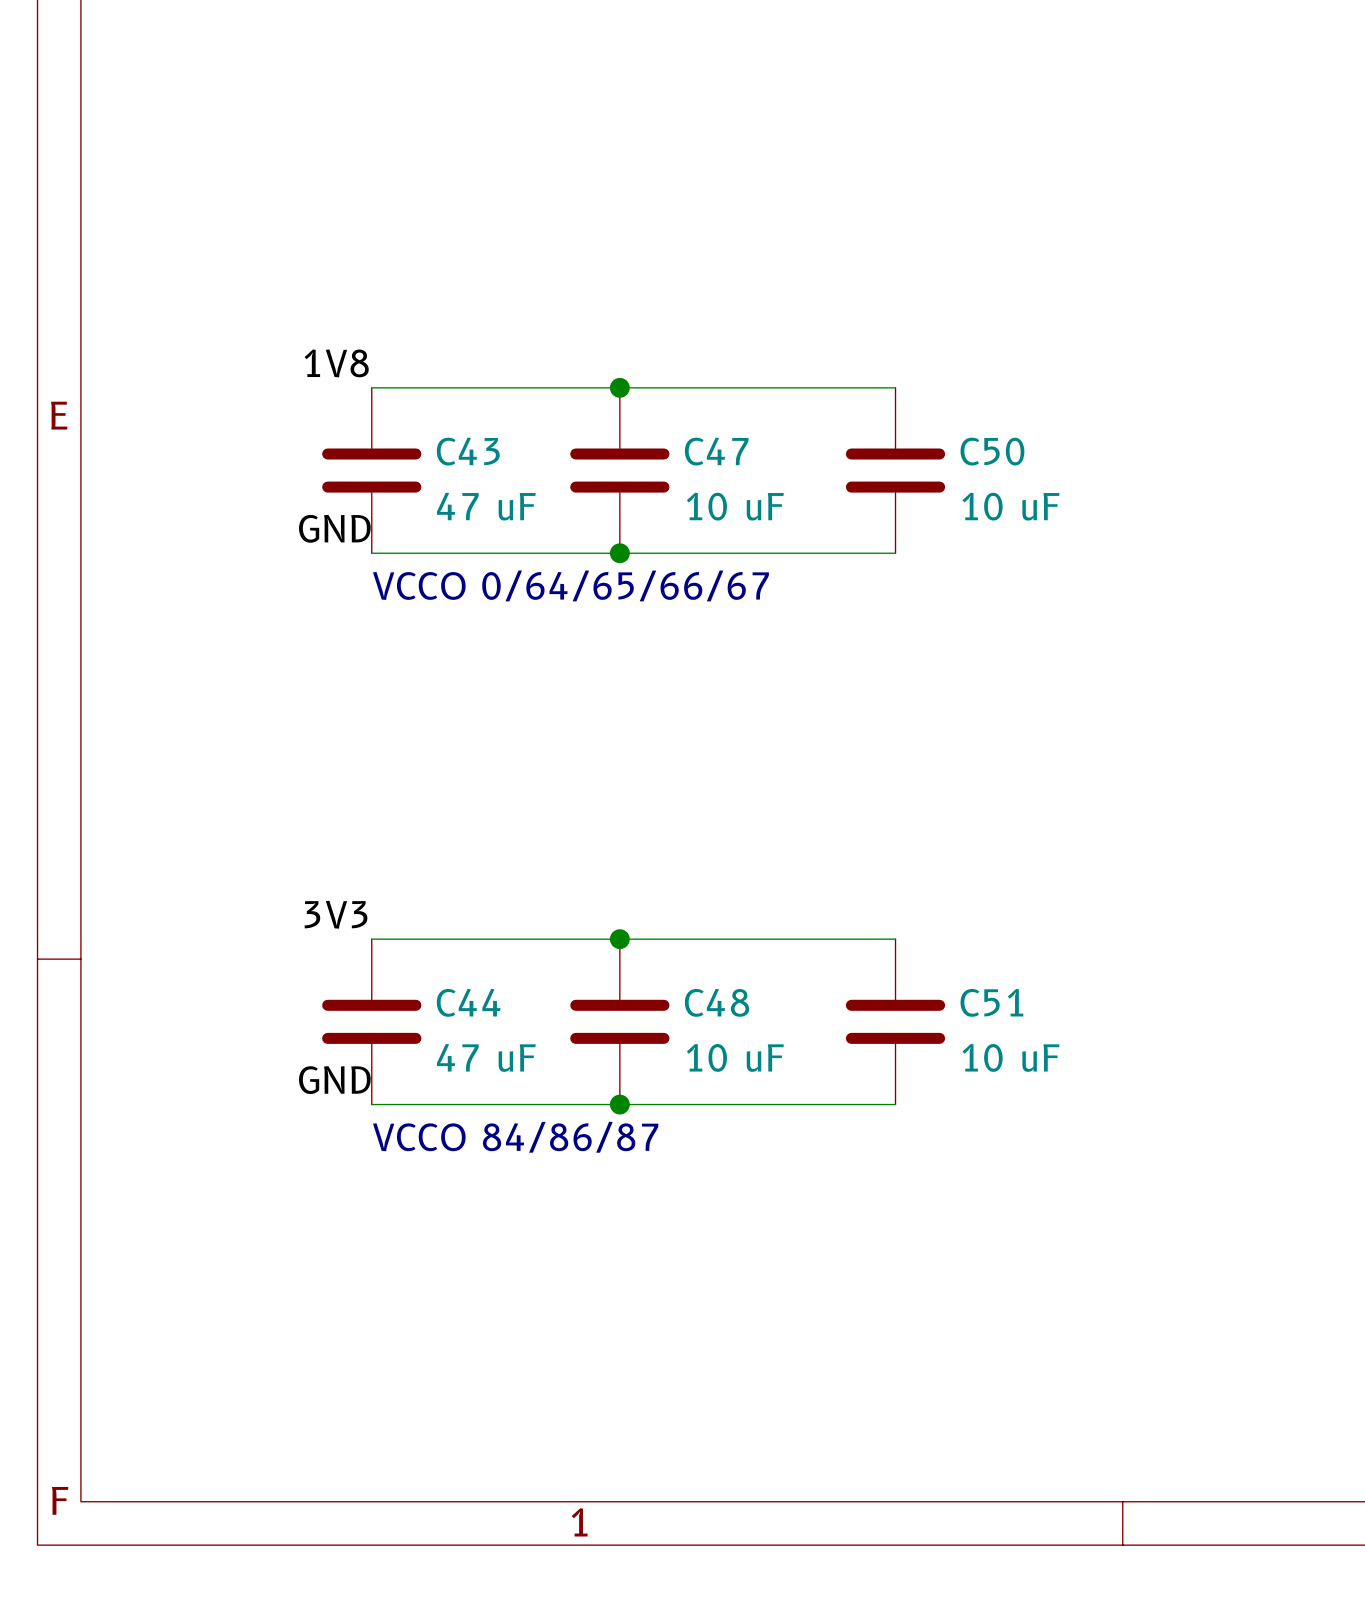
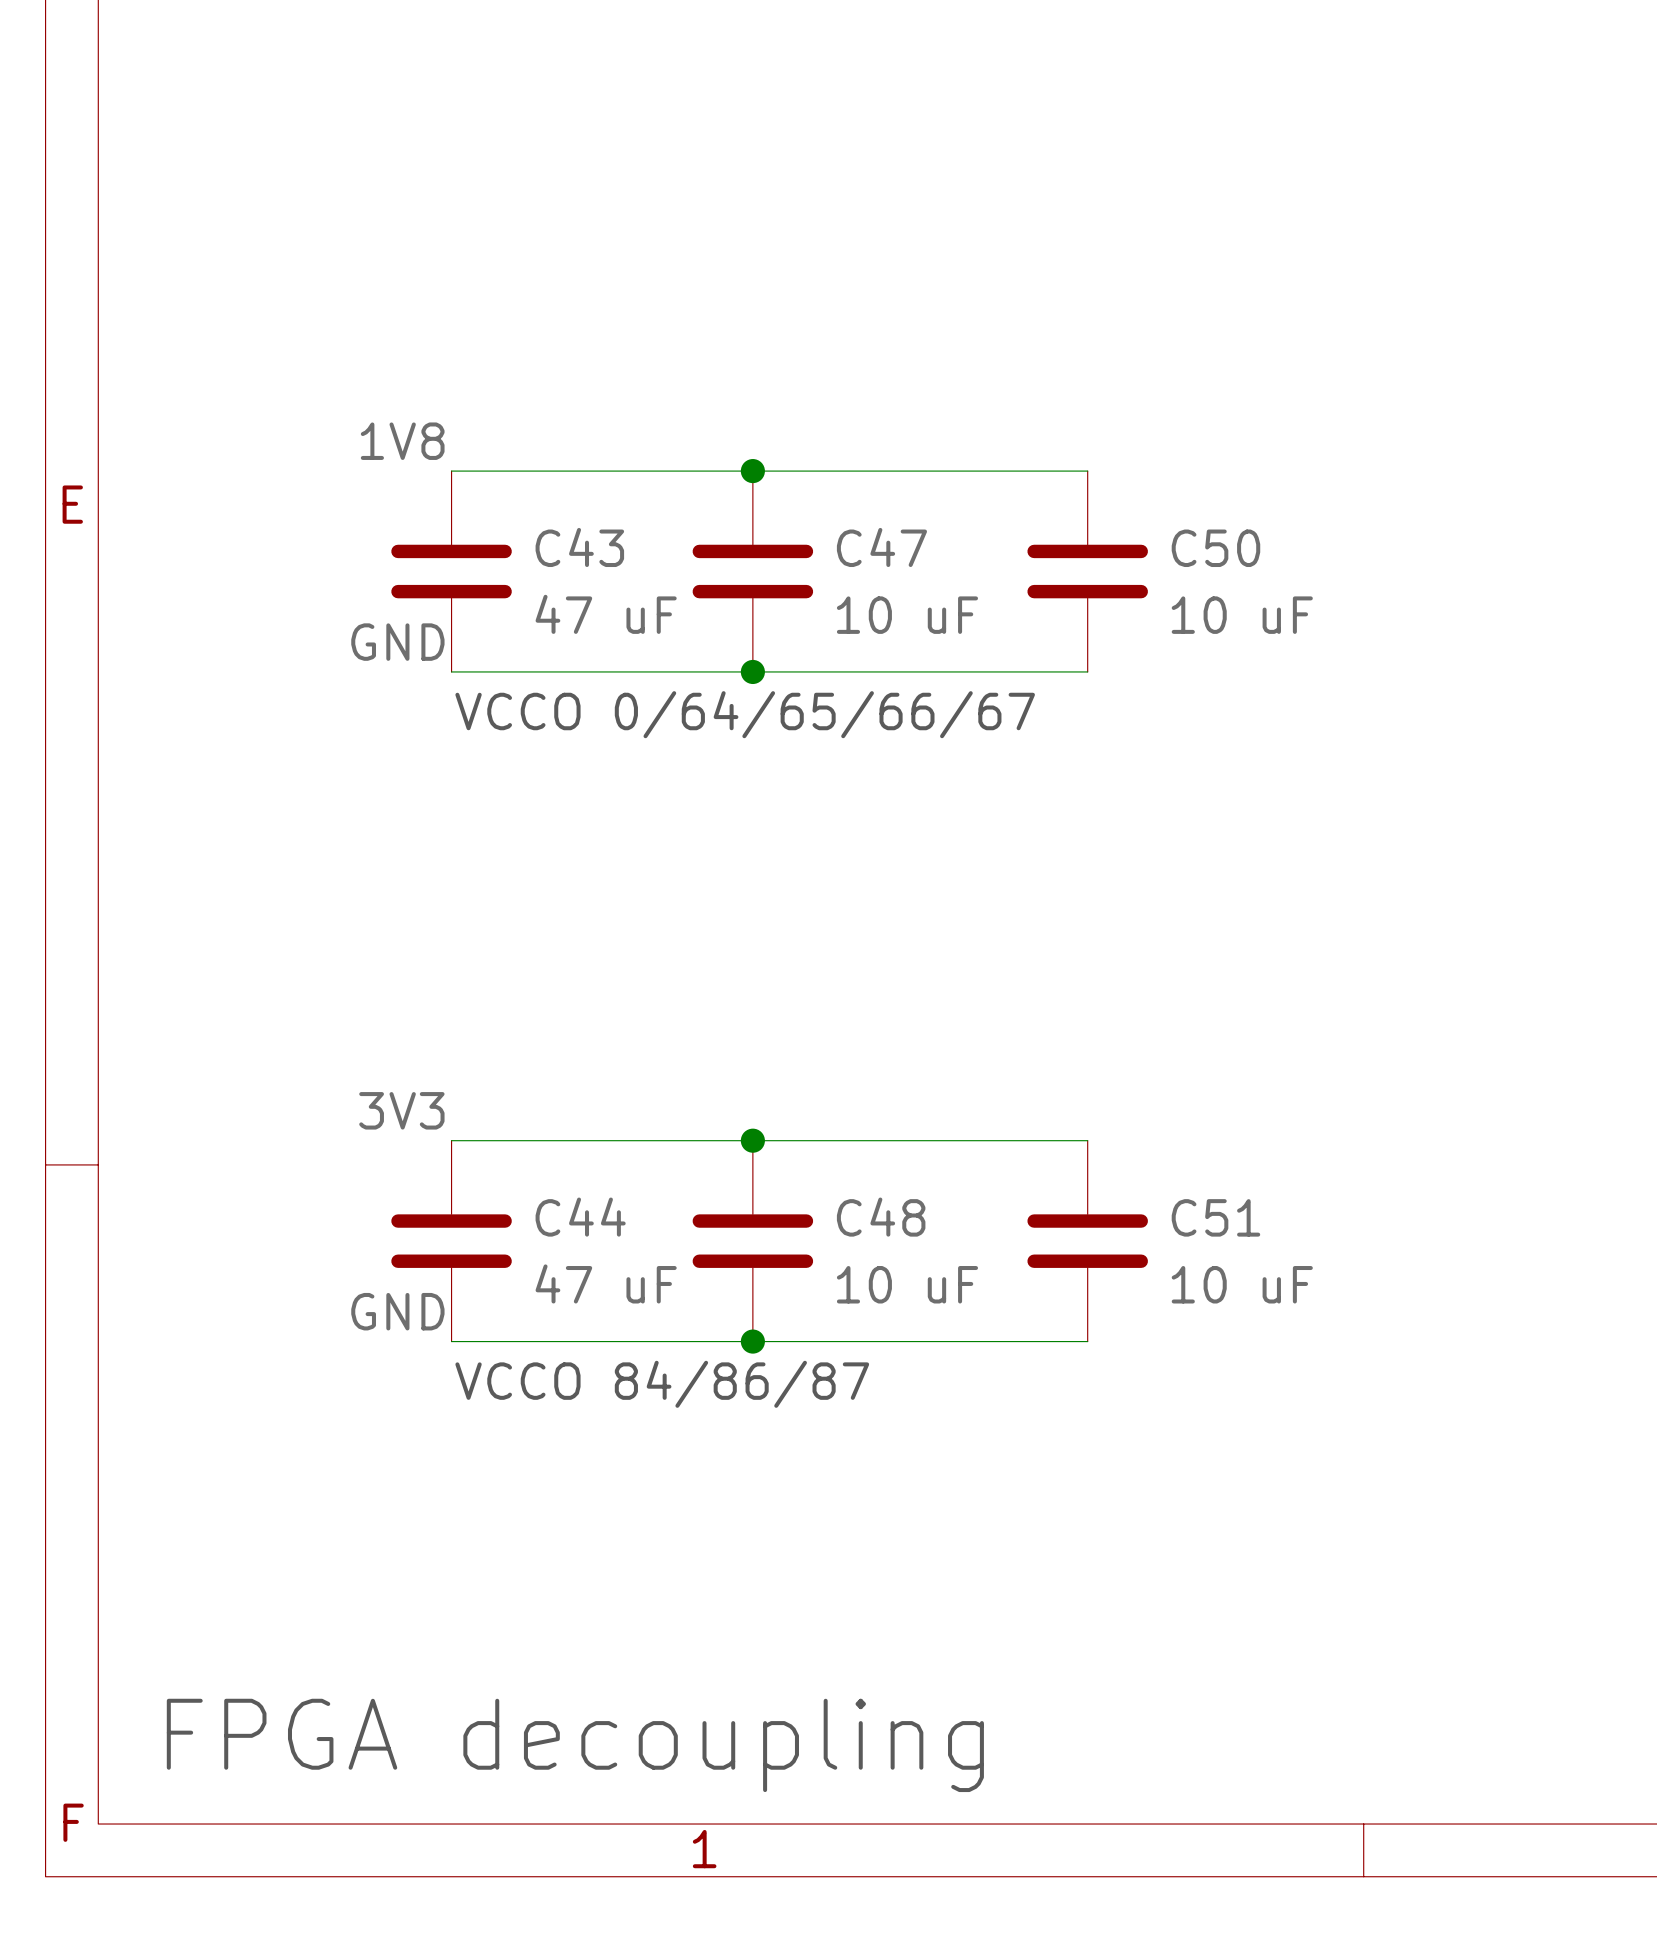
text: none -> FPGA decoupling (575, 1745)

